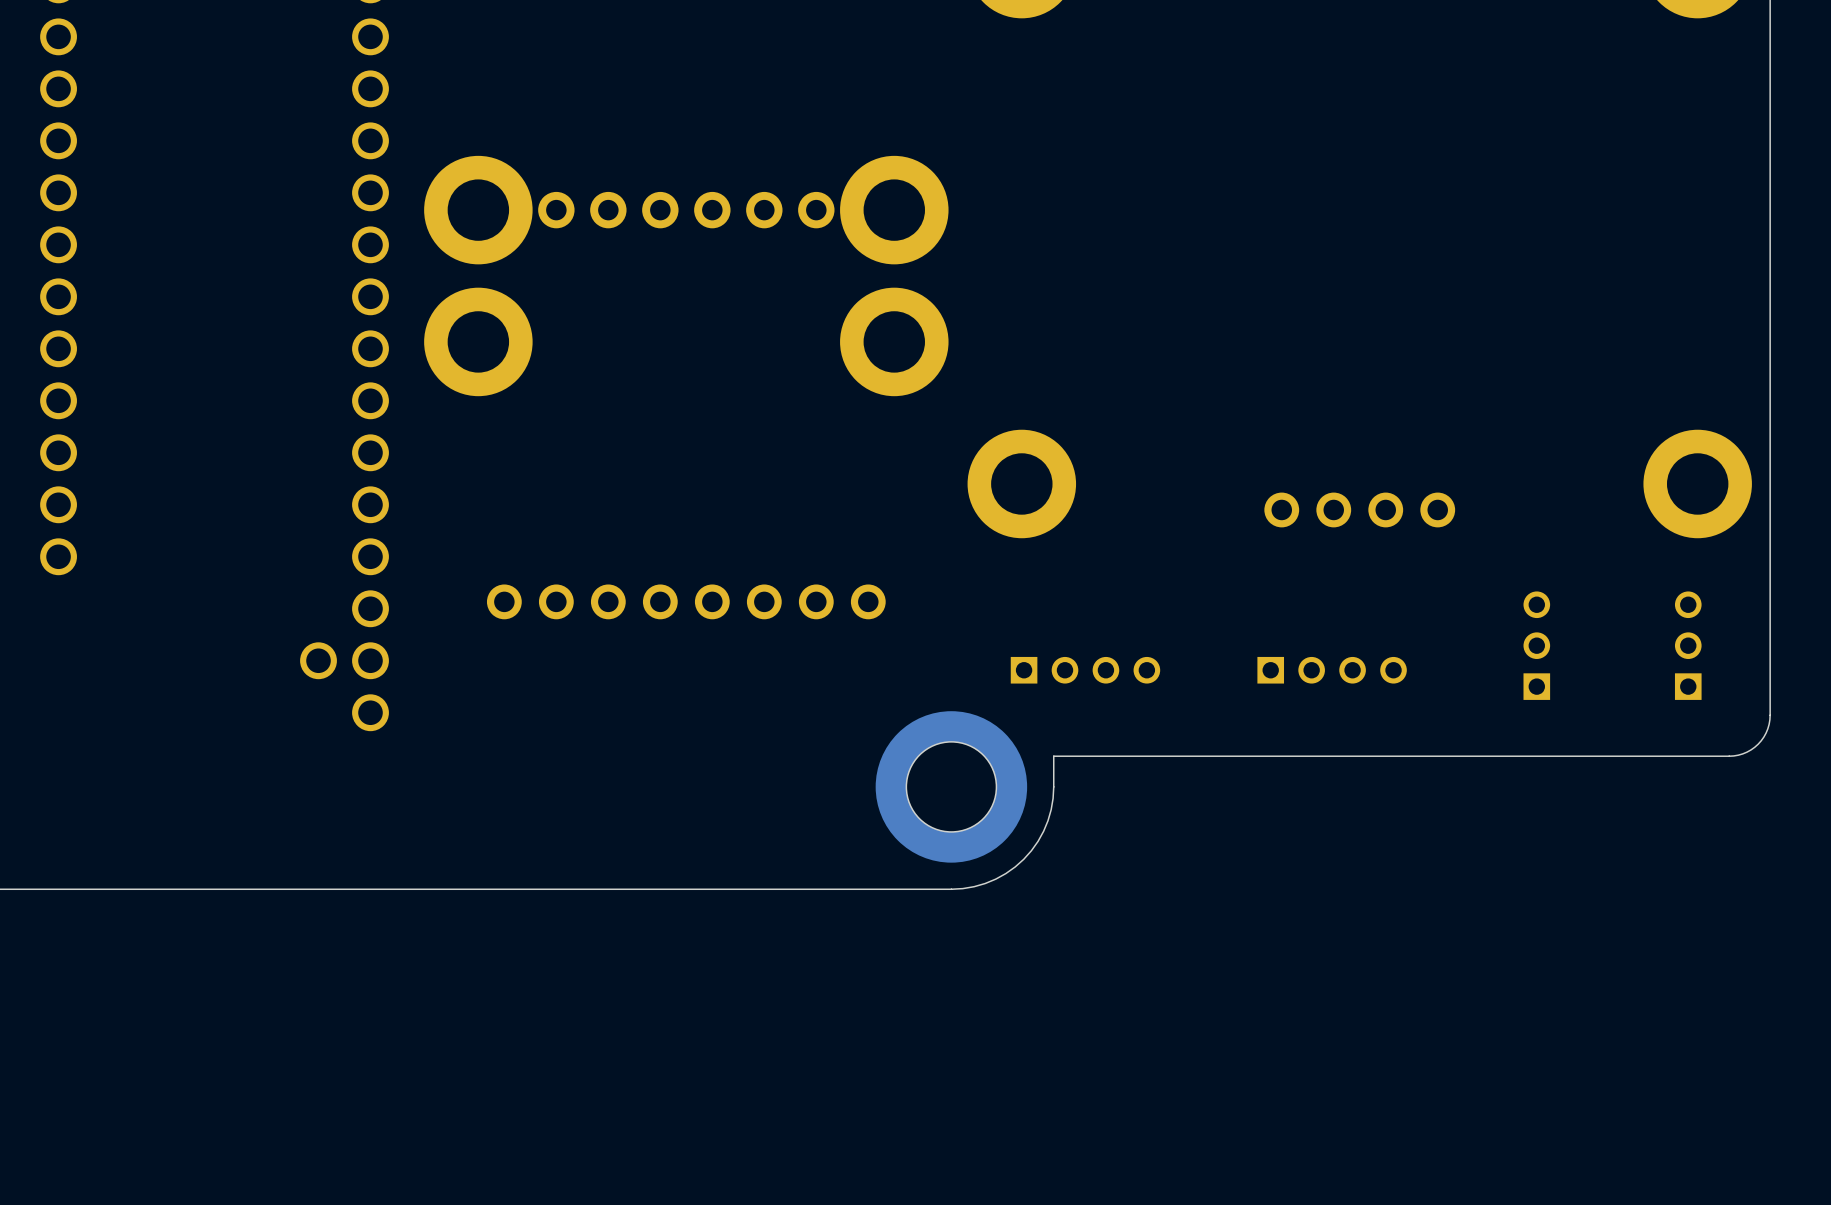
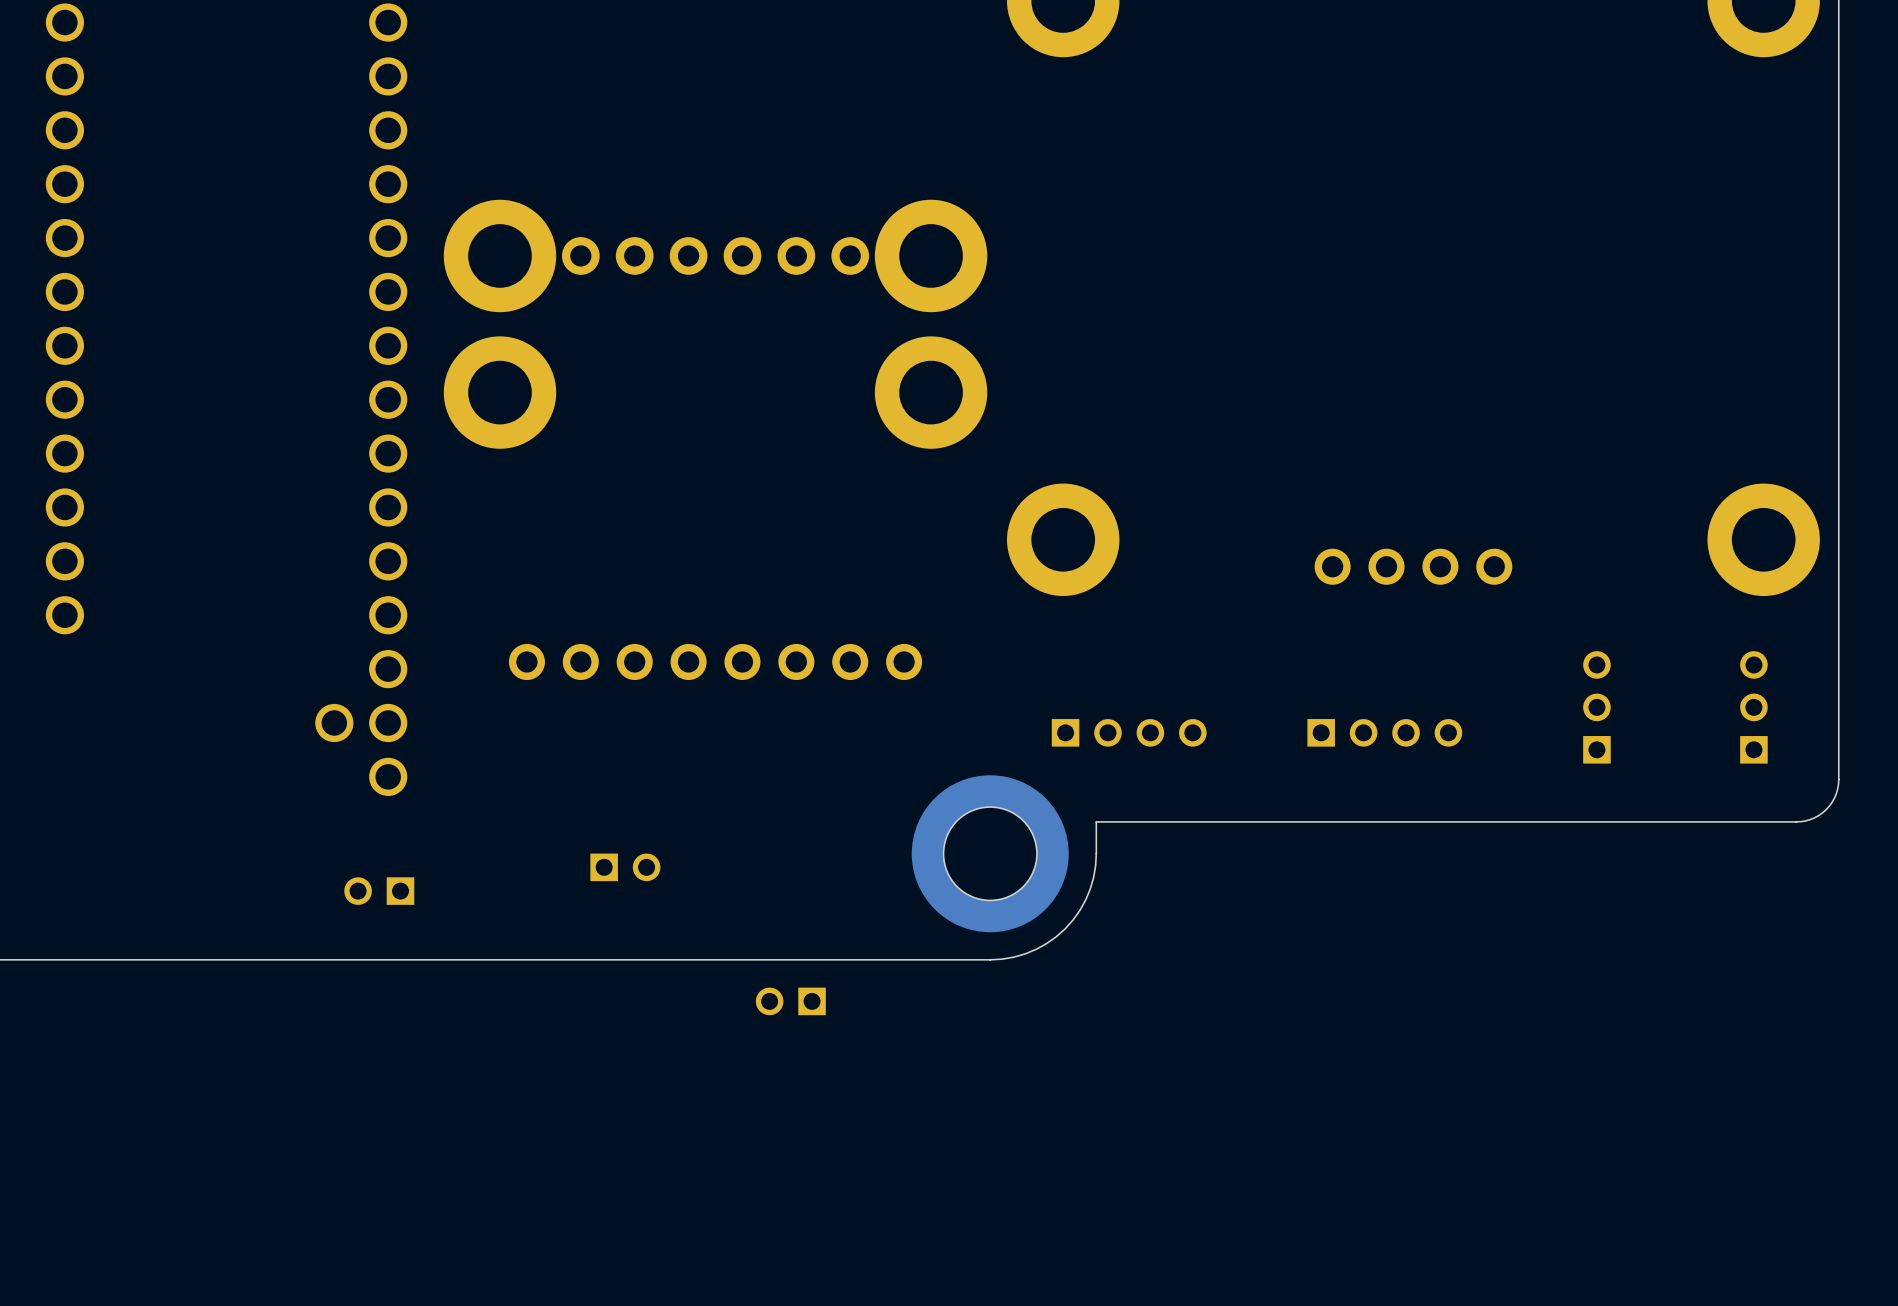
part: none -> (625, 867)
part: none -> (379, 891)
part: none -> (790, 1001)

